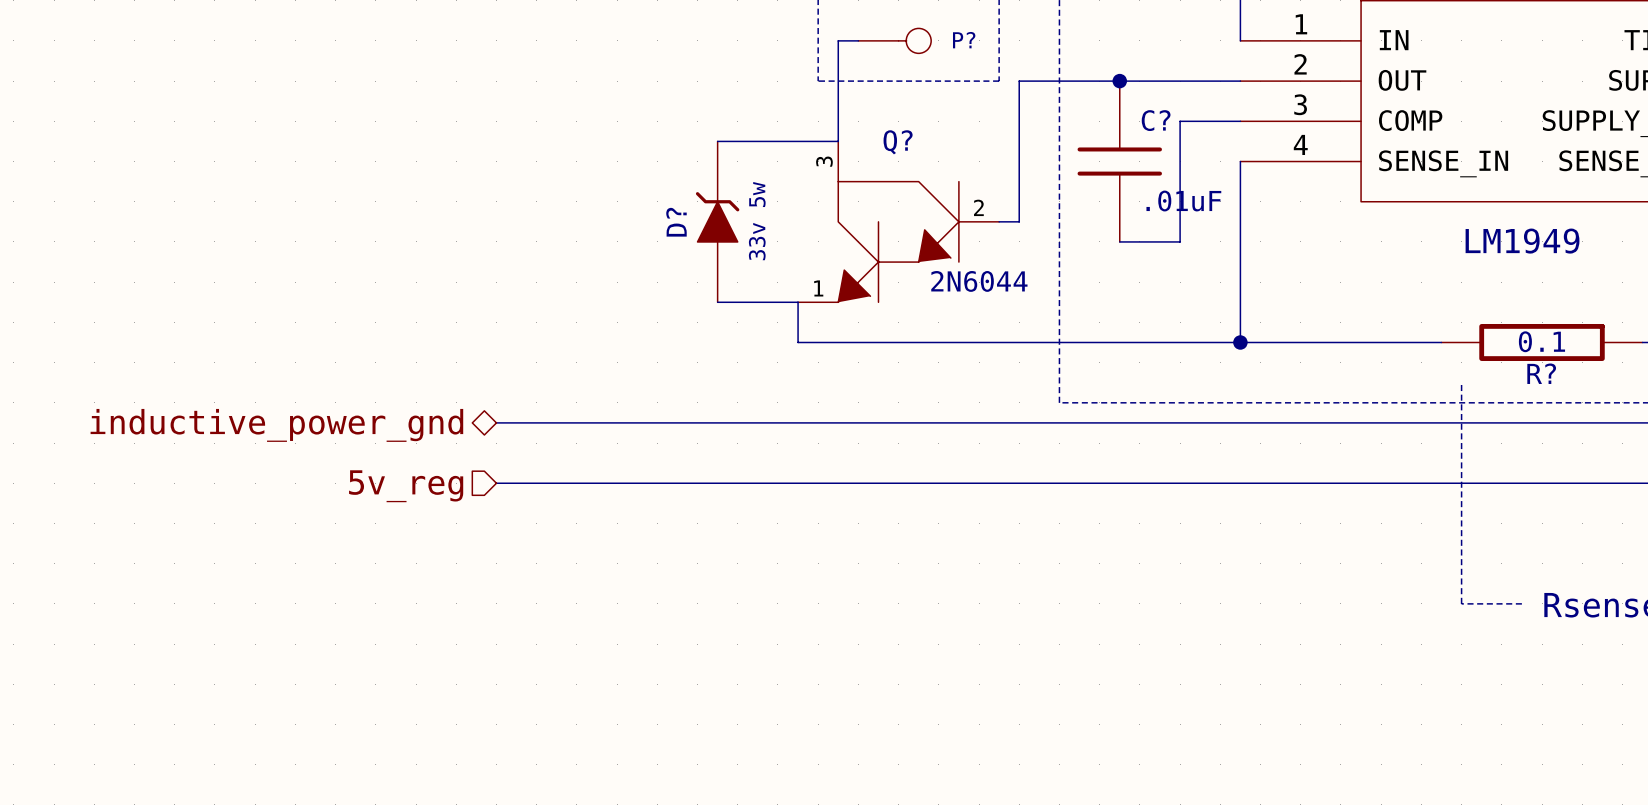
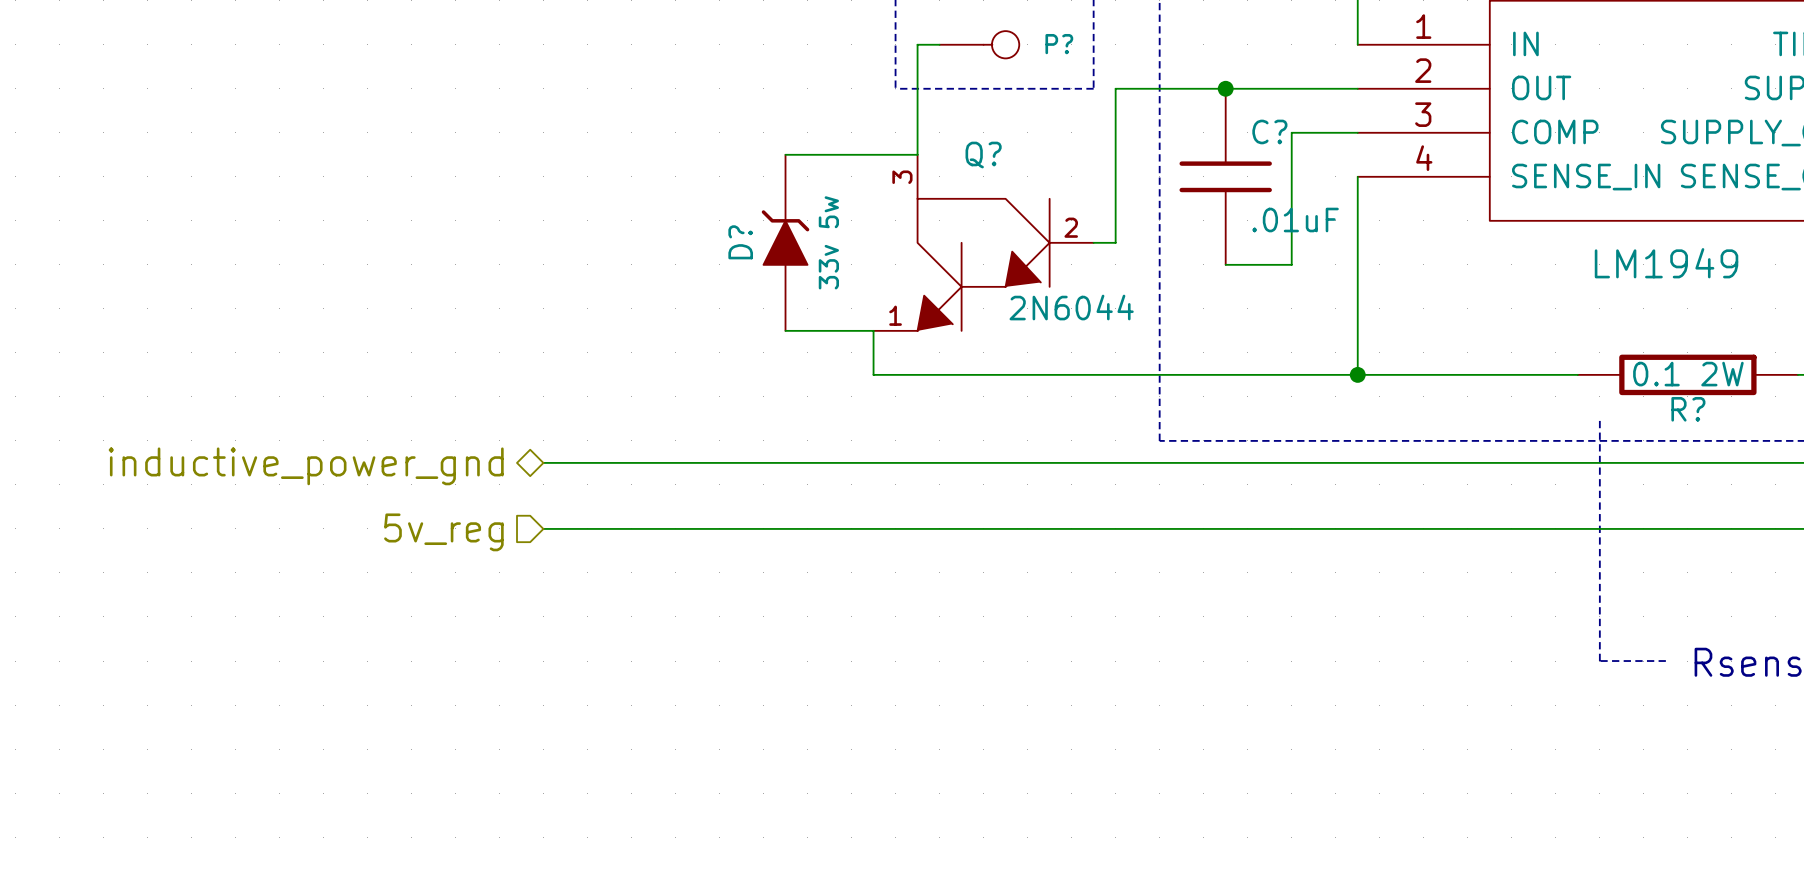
R? value: 0.1 (1541, 341) -> 0.1 2W (1688, 374)

